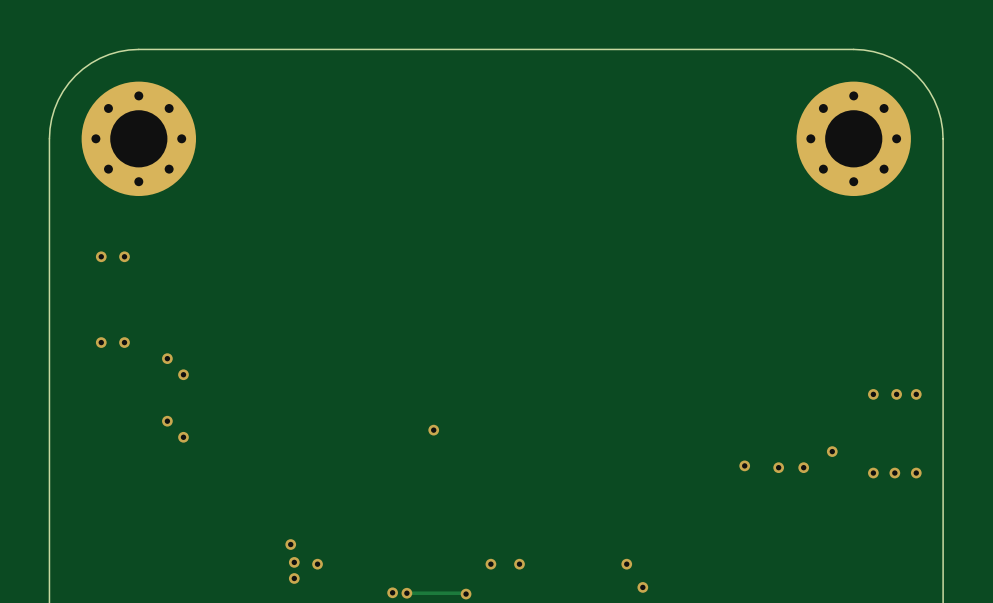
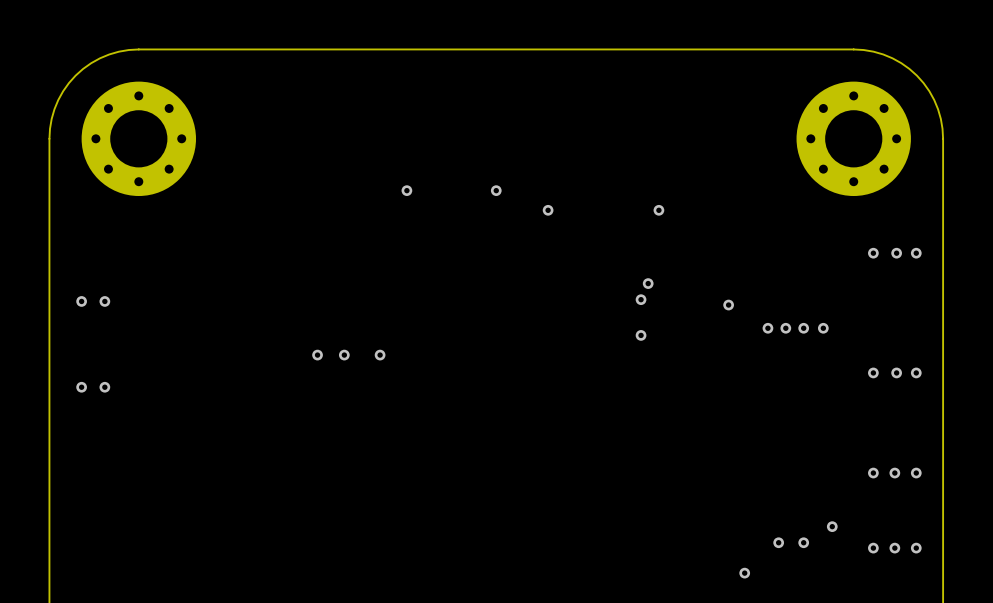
via: none -> (406, 190)
via: none -> (496, 190)
via: none -> (548, 210)
via: none -> (658, 210)
via: none -> (873, 253)
via: none -> (896, 253)
via: none -> (916, 253)
via: (101, 256) -> none
via: (124, 256) -> none
via: none -> (648, 283)
via: none -> (641, 299)
via: none -> (81, 301)
via: none -> (104, 301)
via: none -> (728, 305)
via: none -> (767, 328)
via: none -> (785, 328)
via: none -> (803, 328)
via: none -> (823, 328)
via: none -> (641, 335)
via: (101, 342) -> none
via: (124, 342) -> none
via: none -> (317, 355)
via: none -> (344, 355)
via: none -> (380, 355)
via: (167, 358) -> none
via: none -> (873, 372)
via: none -> (896, 372)
via: none -> (916, 372)
via: (183, 374) -> none
via: none -> (81, 387)
via: none -> (104, 387)
via: (873, 394) -> none
via: (896, 394) -> none
via: (916, 394) -> none
via: (167, 421) -> none
via: (433, 430) -> none
via: (183, 437) -> none
via: (832, 451) -> none
via: (744, 465) -> none
via: (778, 467) -> none
via: (803, 467) -> none
via: none -> (832, 526)
via: none -> (778, 542)
via: none -> (803, 542)
via: (290, 544) -> none
via: none -> (873, 548)
via: none -> (894, 548)
via: none -> (916, 548)
via: (294, 562) -> none
via: (317, 564) -> none
via: (490, 564) -> none
via: (519, 564) -> none
via: (626, 564) -> none
via: none -> (744, 573)
via: (294, 578) -> none
via: (642, 587) -> none
via: (392, 592) -> none
track: (406, 593) (466, 594) -> none
via: (406, 593) -> none
via: (466, 594) -> none

